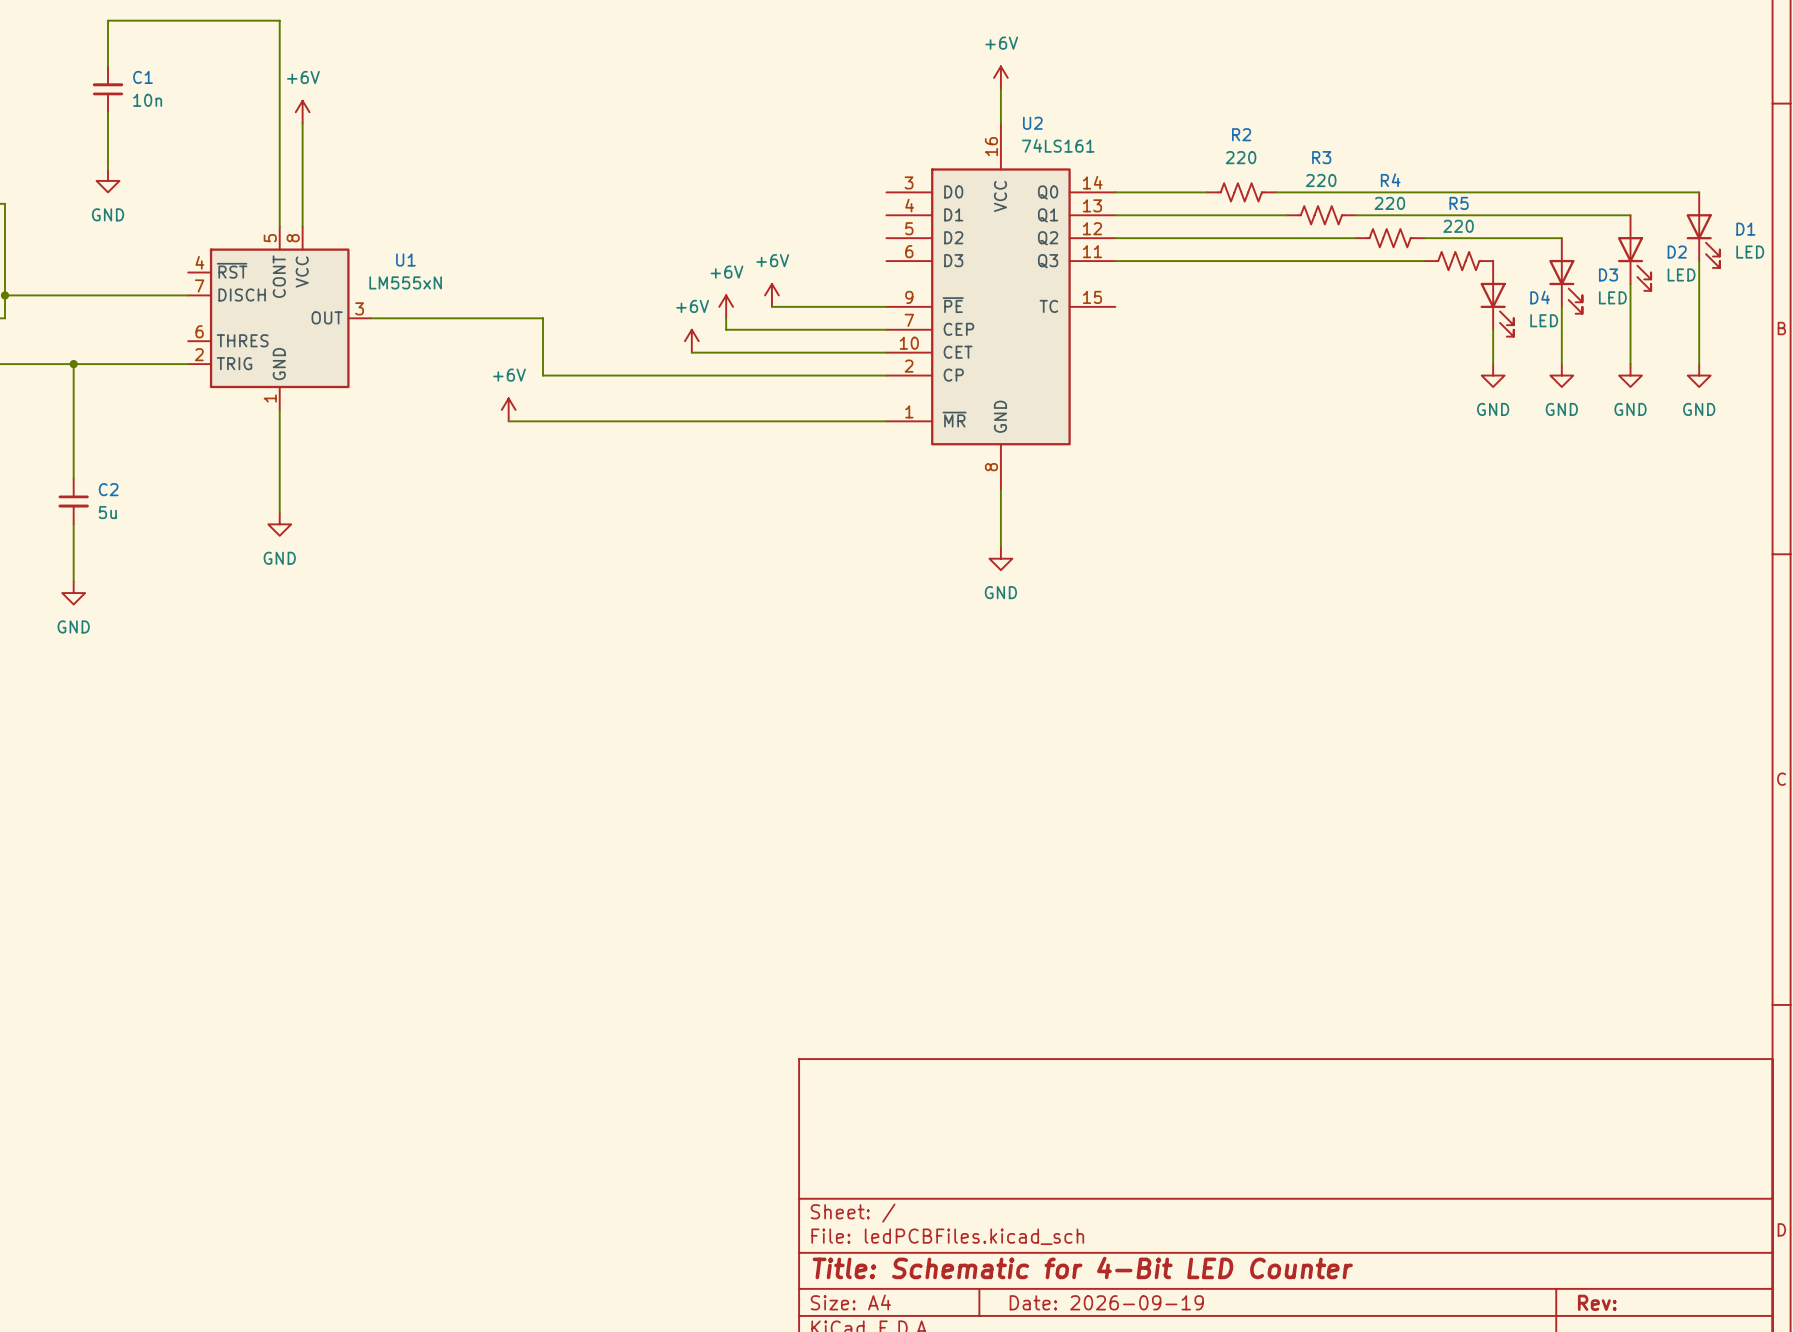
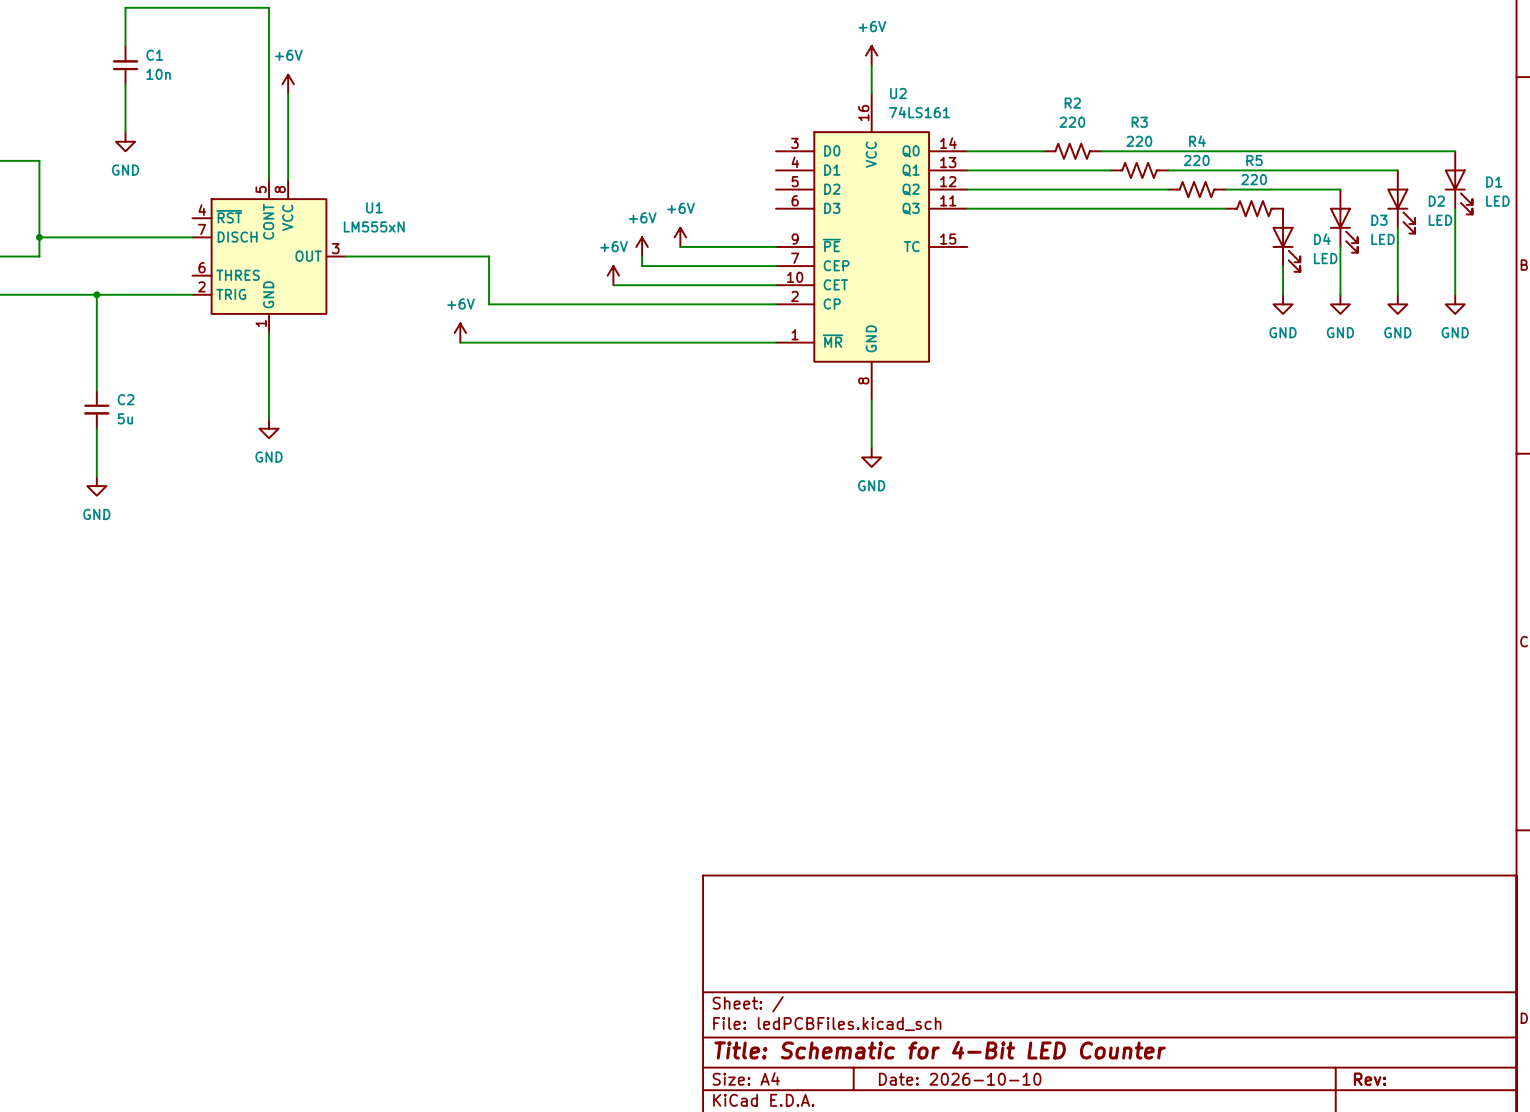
title block: Date: 2026-09-19 (1106, 1302) -> Date: 2026-10-10 (960, 1079)

